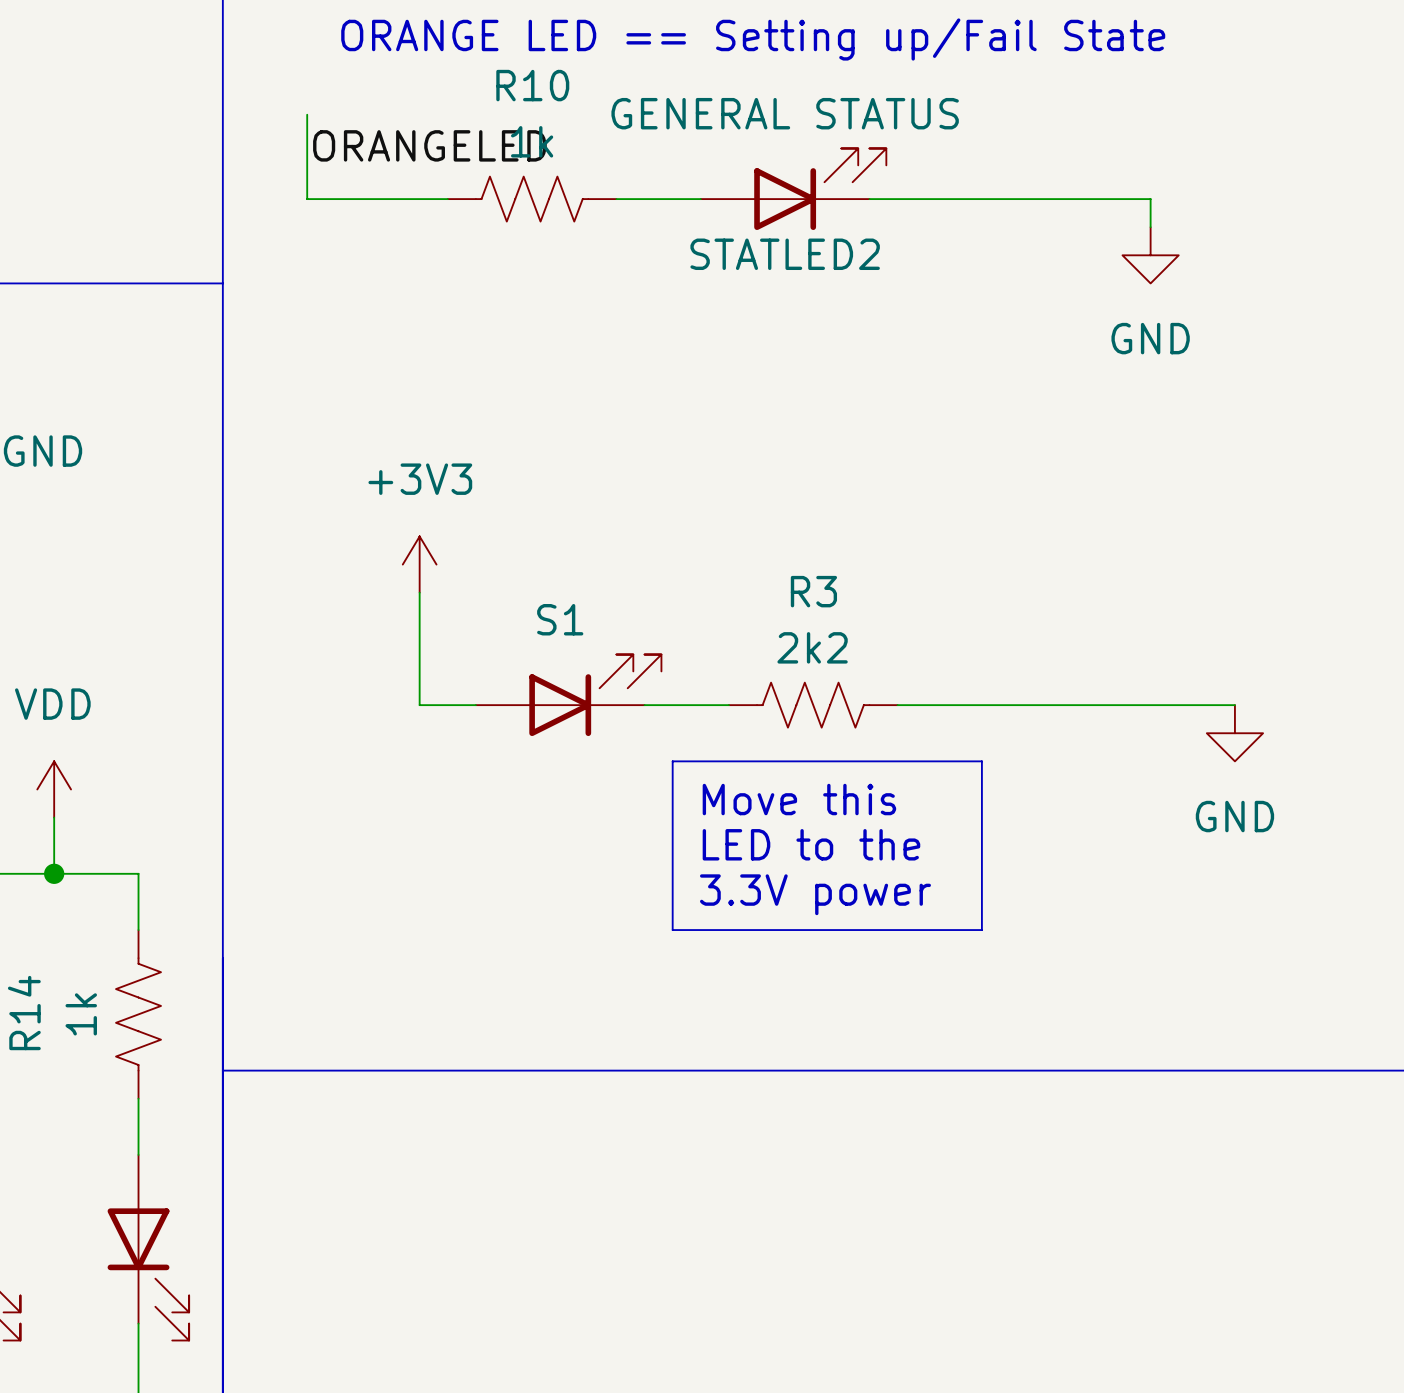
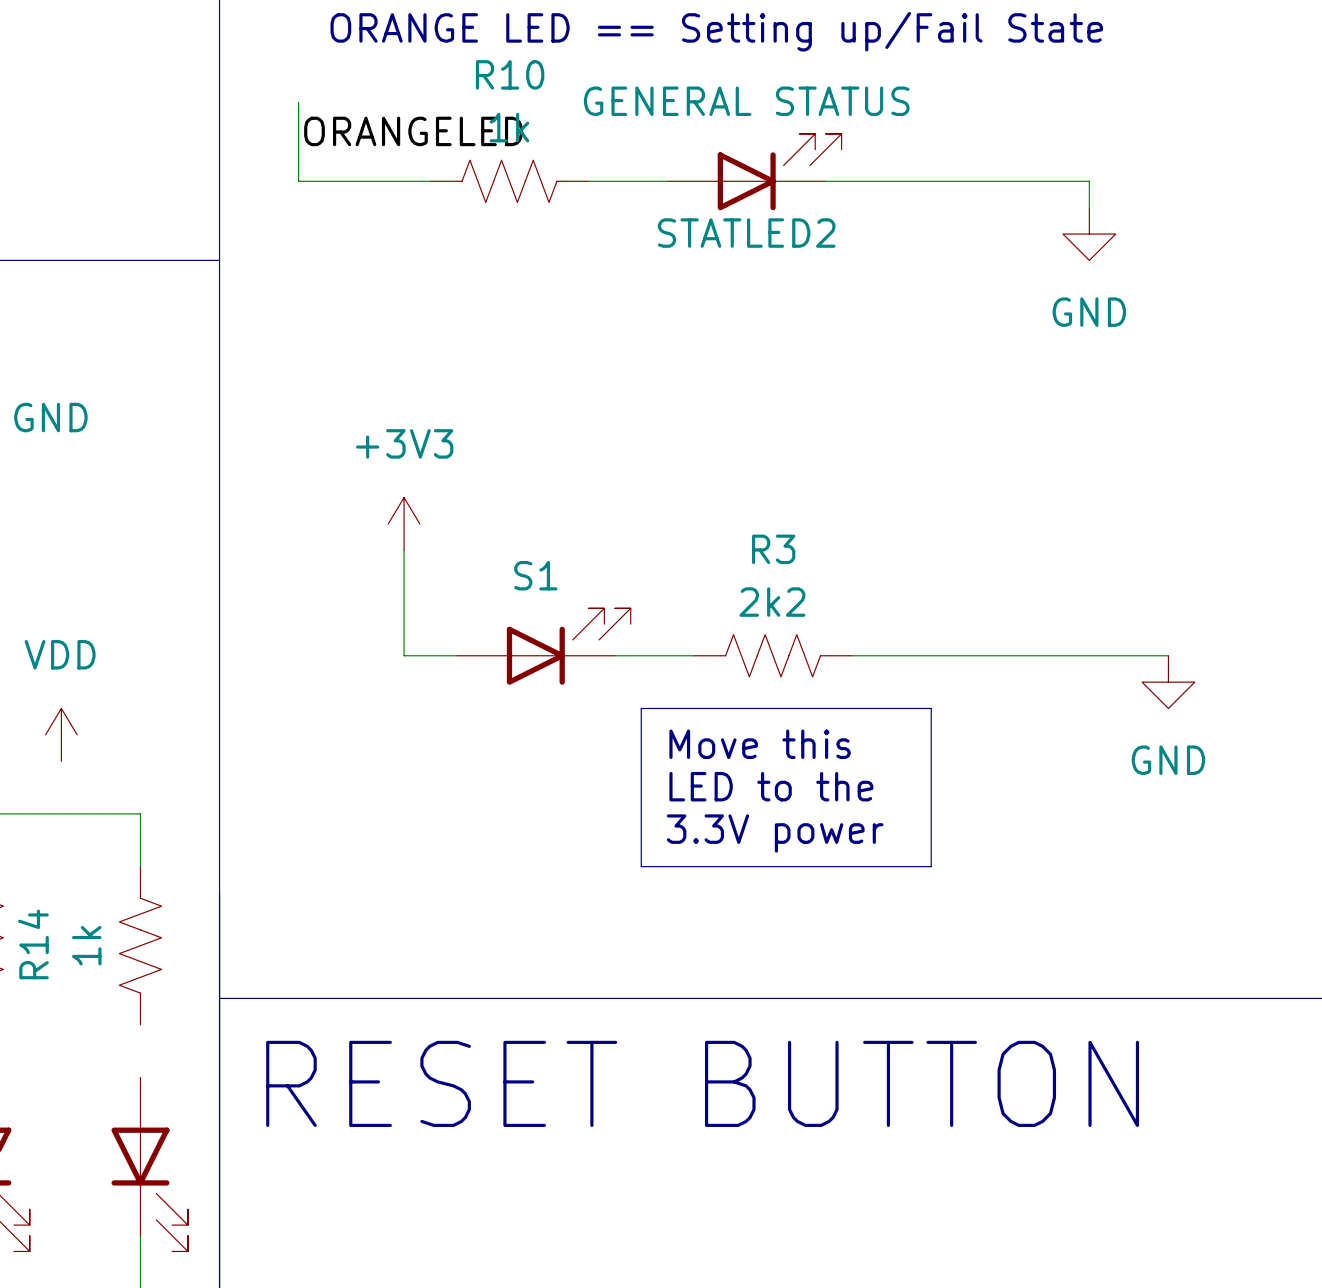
wire: (54, 817) (54, 873) -> none
junction: (54, 873) -> none
wire: (138, 1098) (138, 1154) -> none
text: none -> RESET BUTTON (702, 1083)

